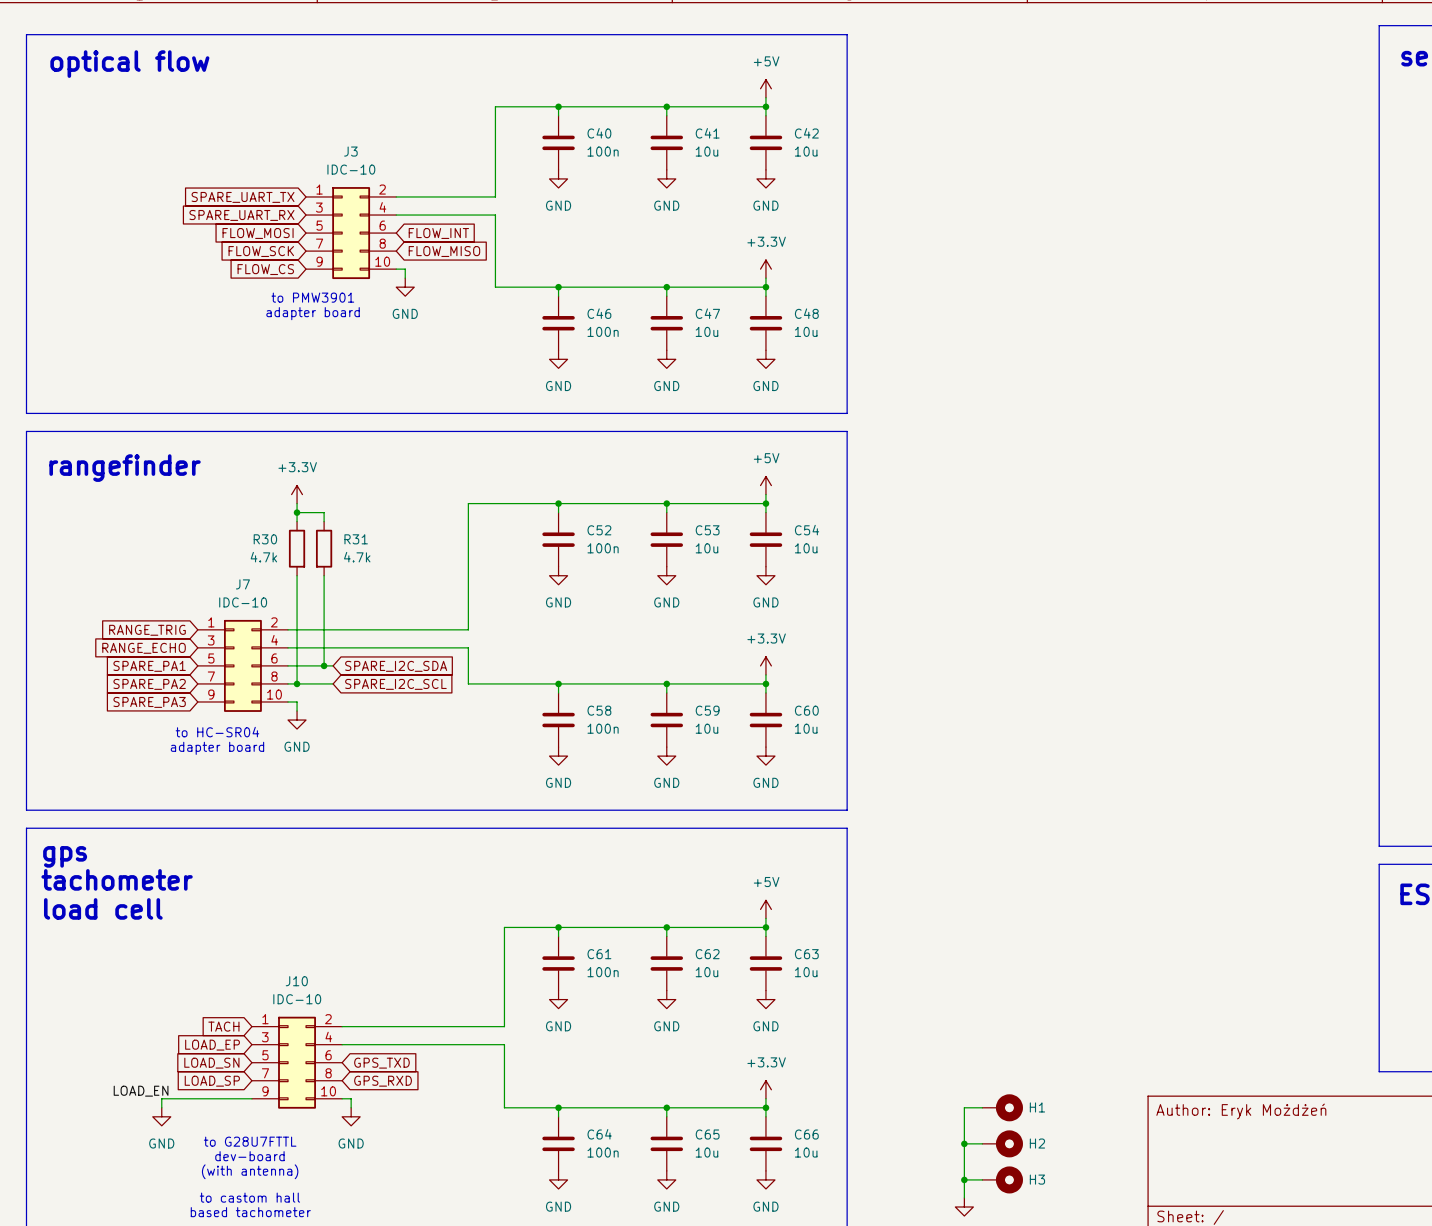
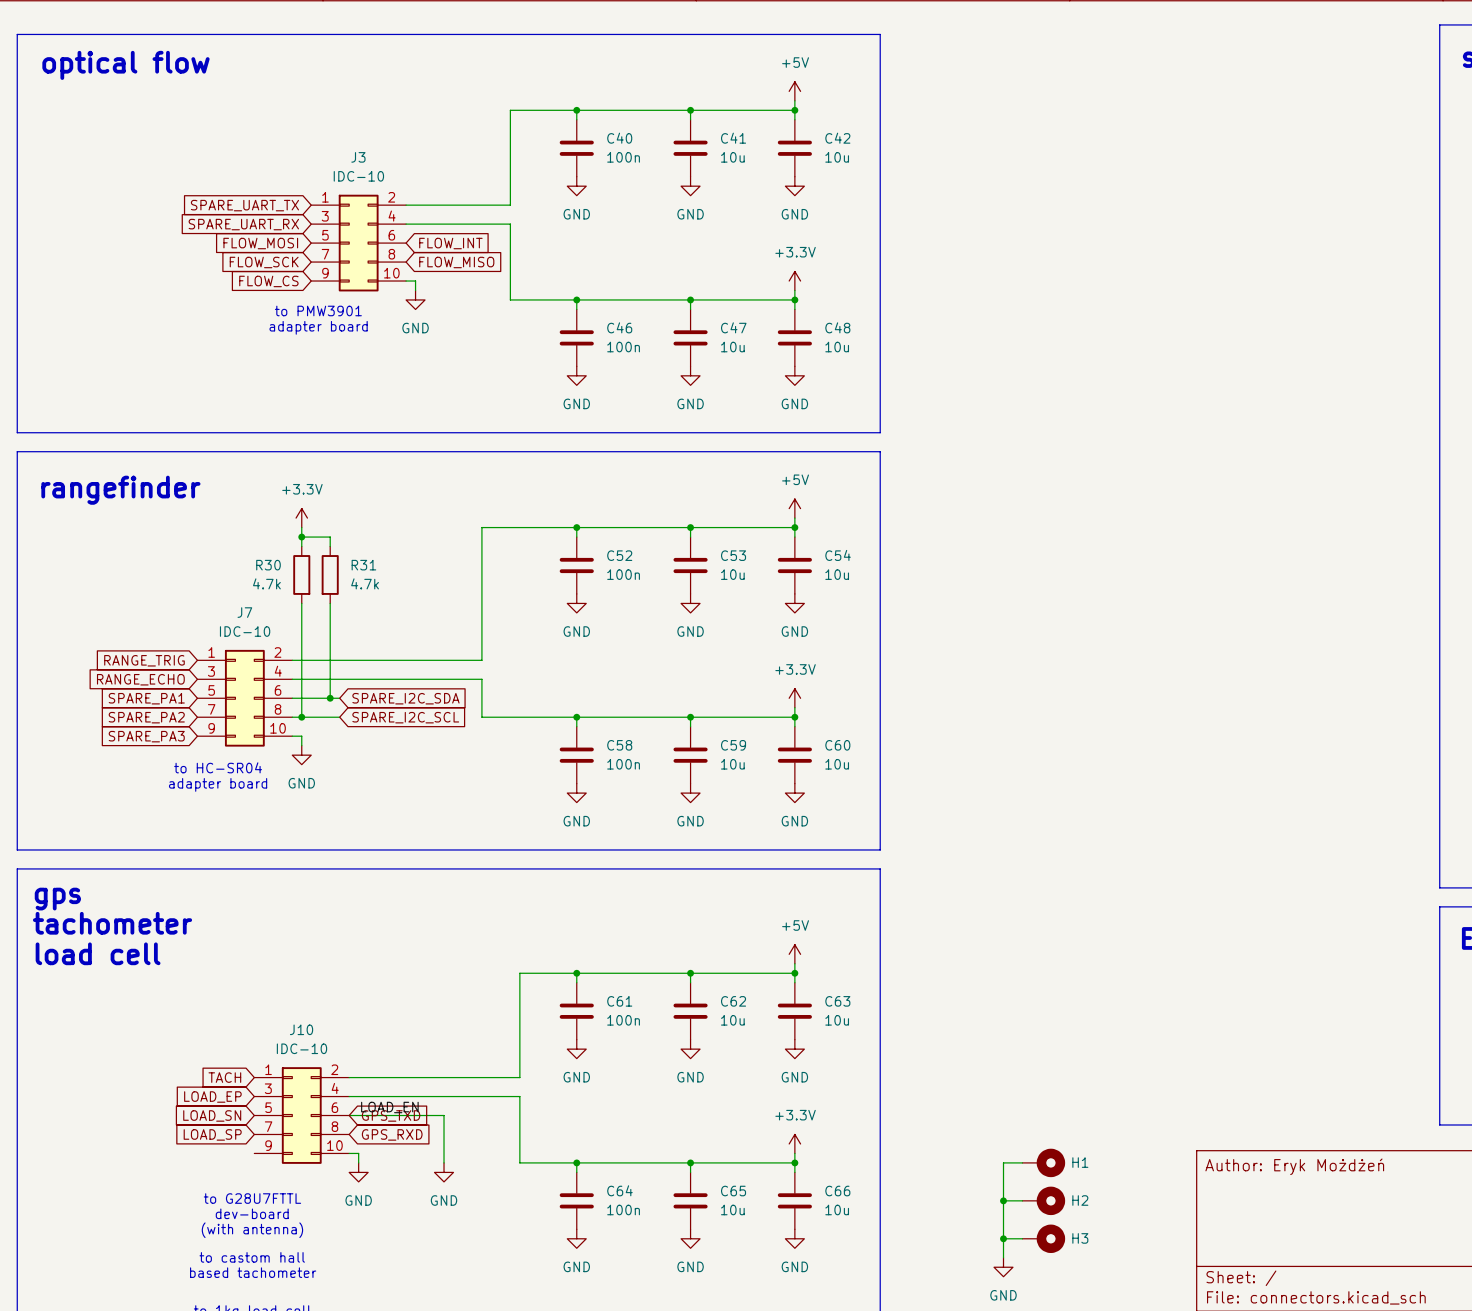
label: none -> LOAD_EN (389, 1107)
wire: none -> (349, 1115) (444, 1115) (444, 1162)
label: LOAD_EN (141, 1091) -> none
wire: (251, 1098) (161, 1098) (161, 1107) -> none
power symbol: GND (161, 1116) -> none
power symbol: none -> GND (444, 1172)

